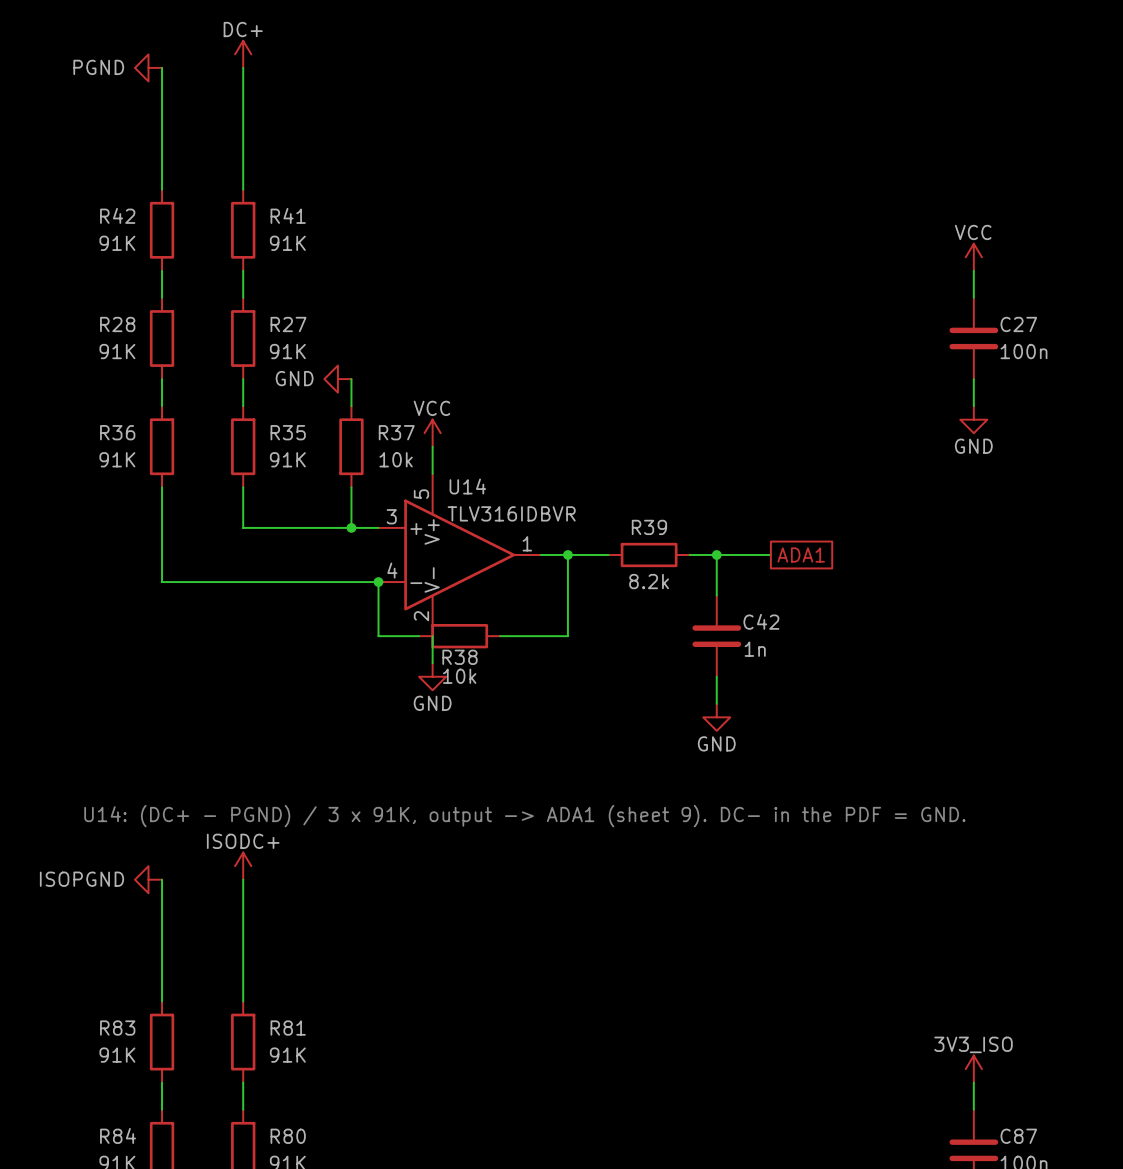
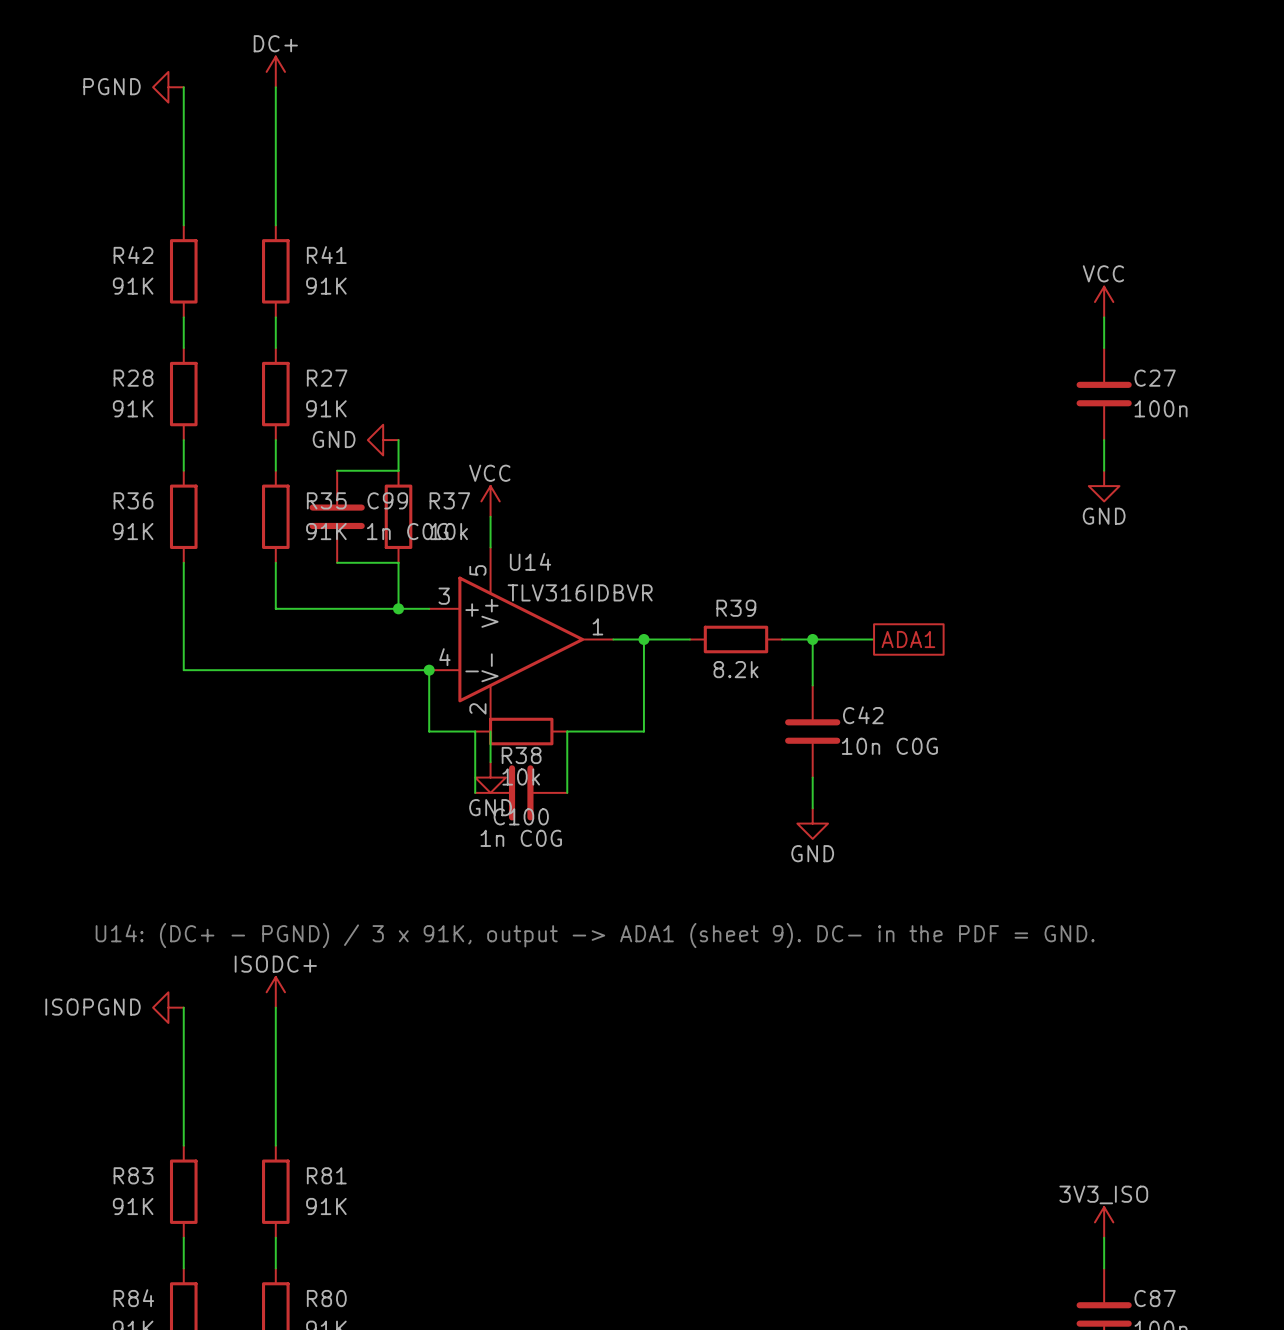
wire: none -> (337, 470) (398, 470)
C99: none -> 1n C0G (337, 516)
wire: none -> (337, 562) (398, 562)
wire: none -> (475, 731) (475, 792)
wire: none -> (567, 731) (567, 792)
C42 value: 1n (755, 649) -> 10n C0G (889, 746)
C100: none -> 1n C0G (521, 792)

